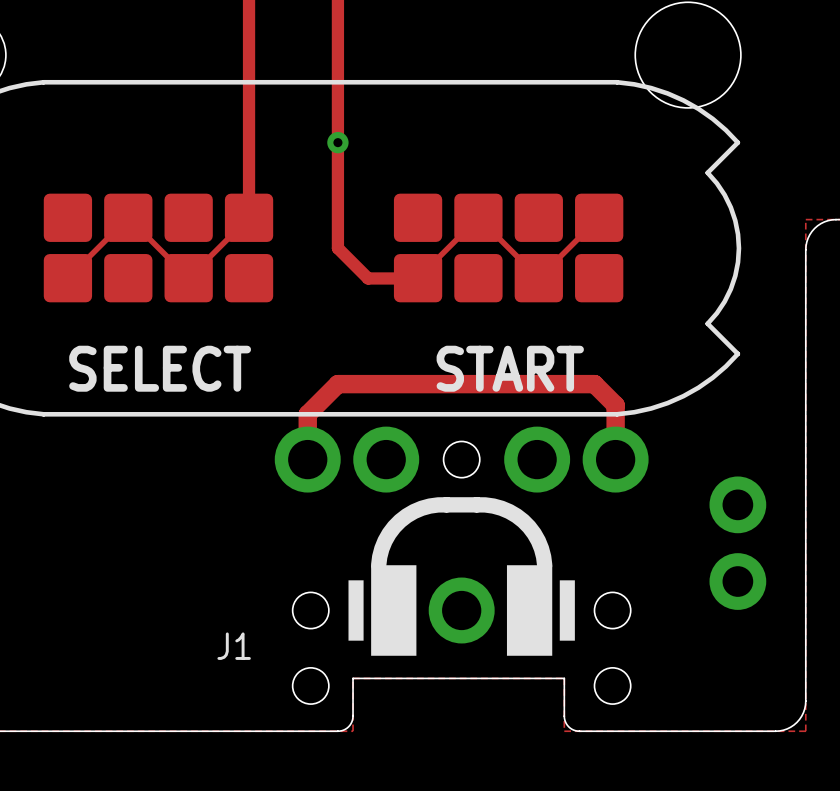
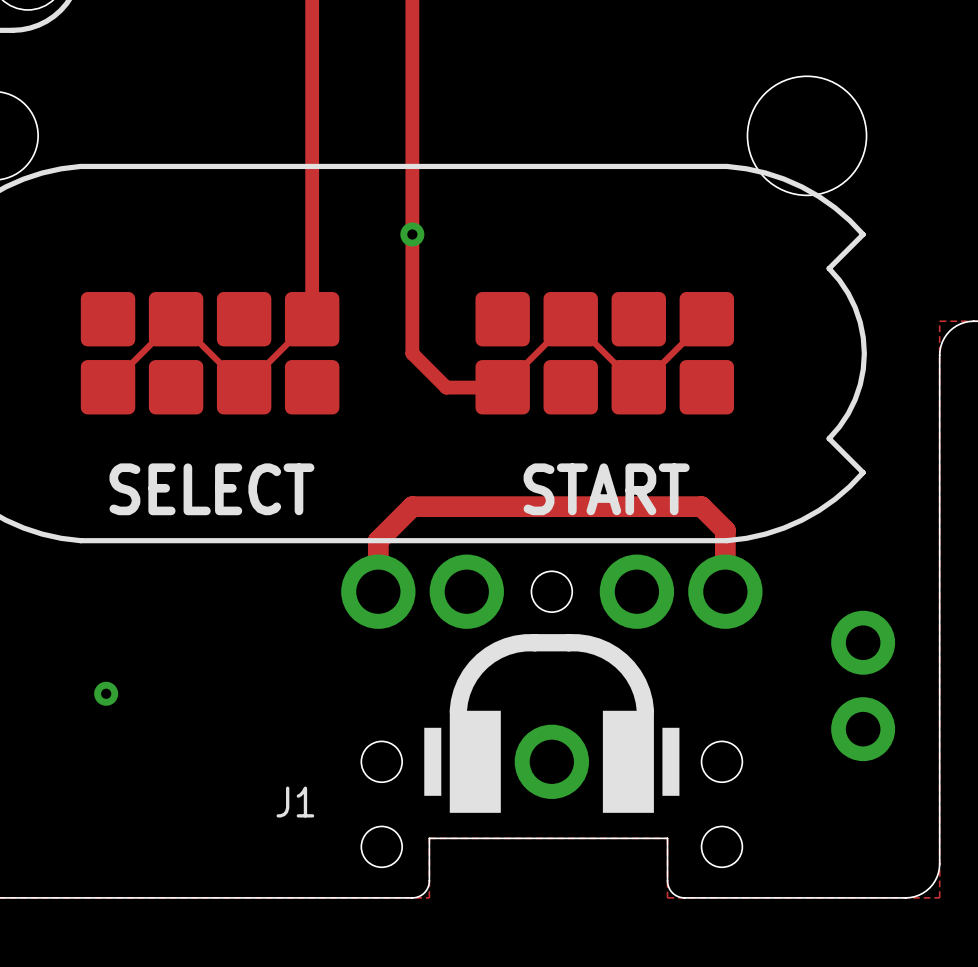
via: none -> (106, 693)

